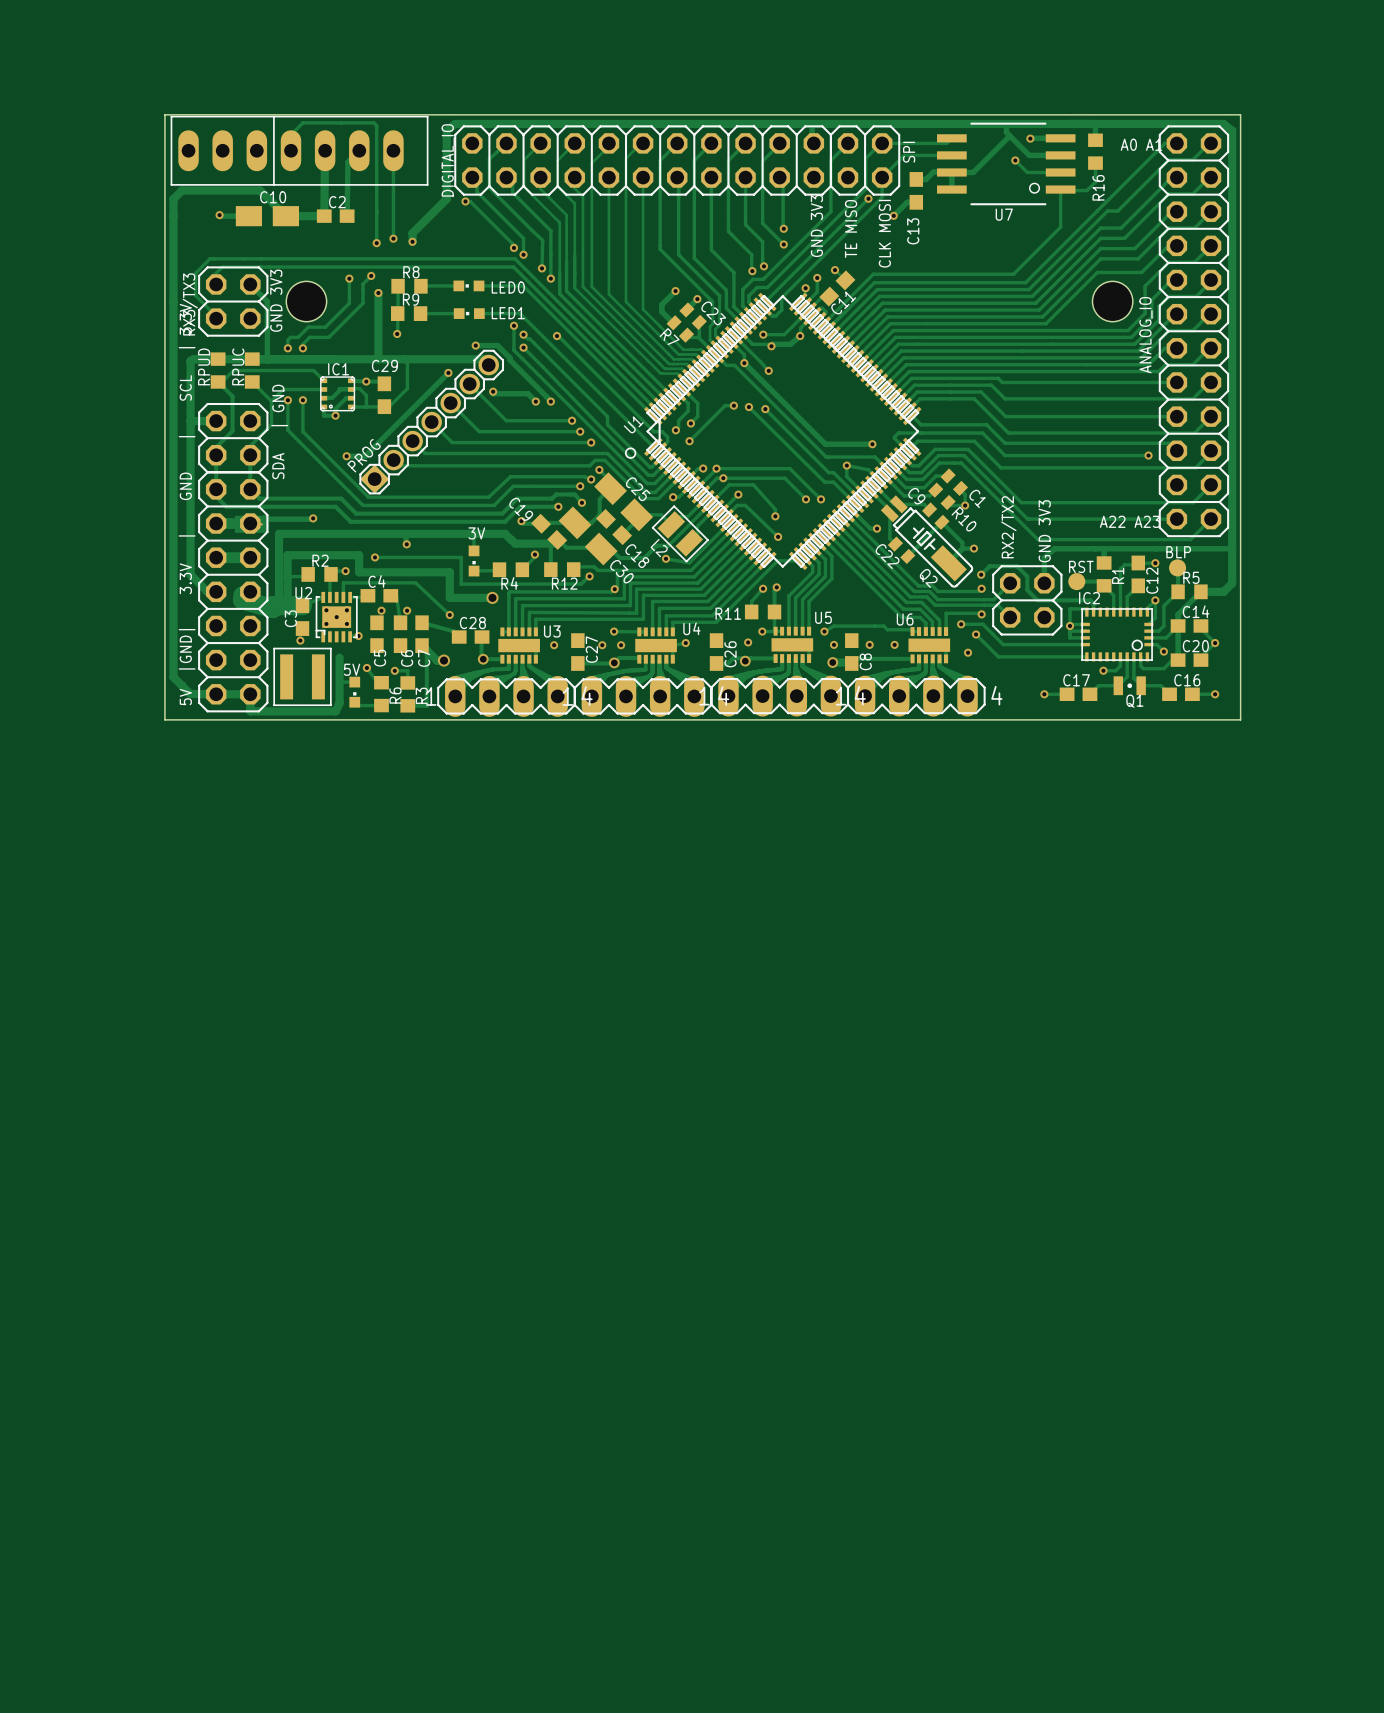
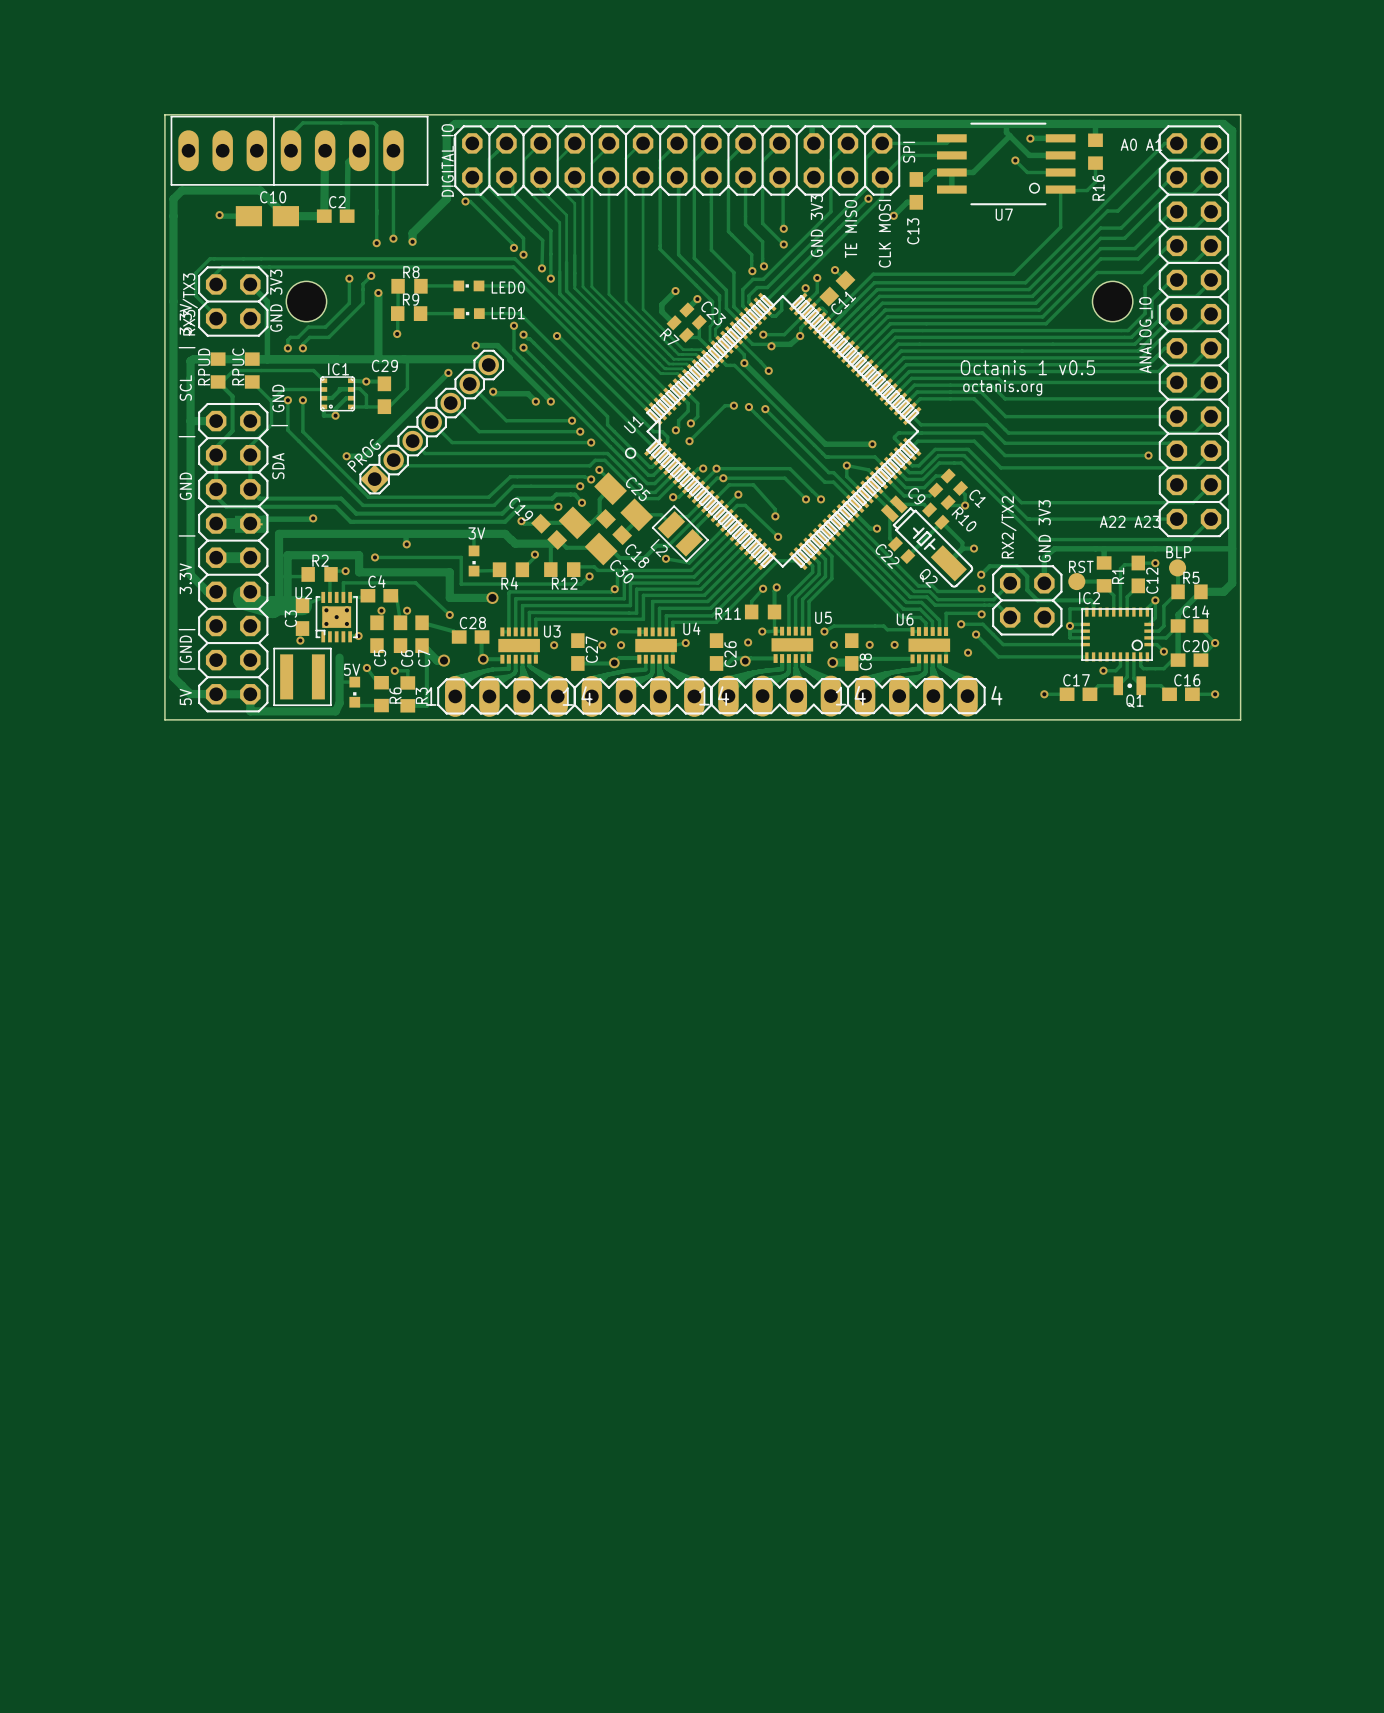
text: none -> Octanis 1 v0.5 (1027, 367)
text: none -> octanis.org (1002, 387)

